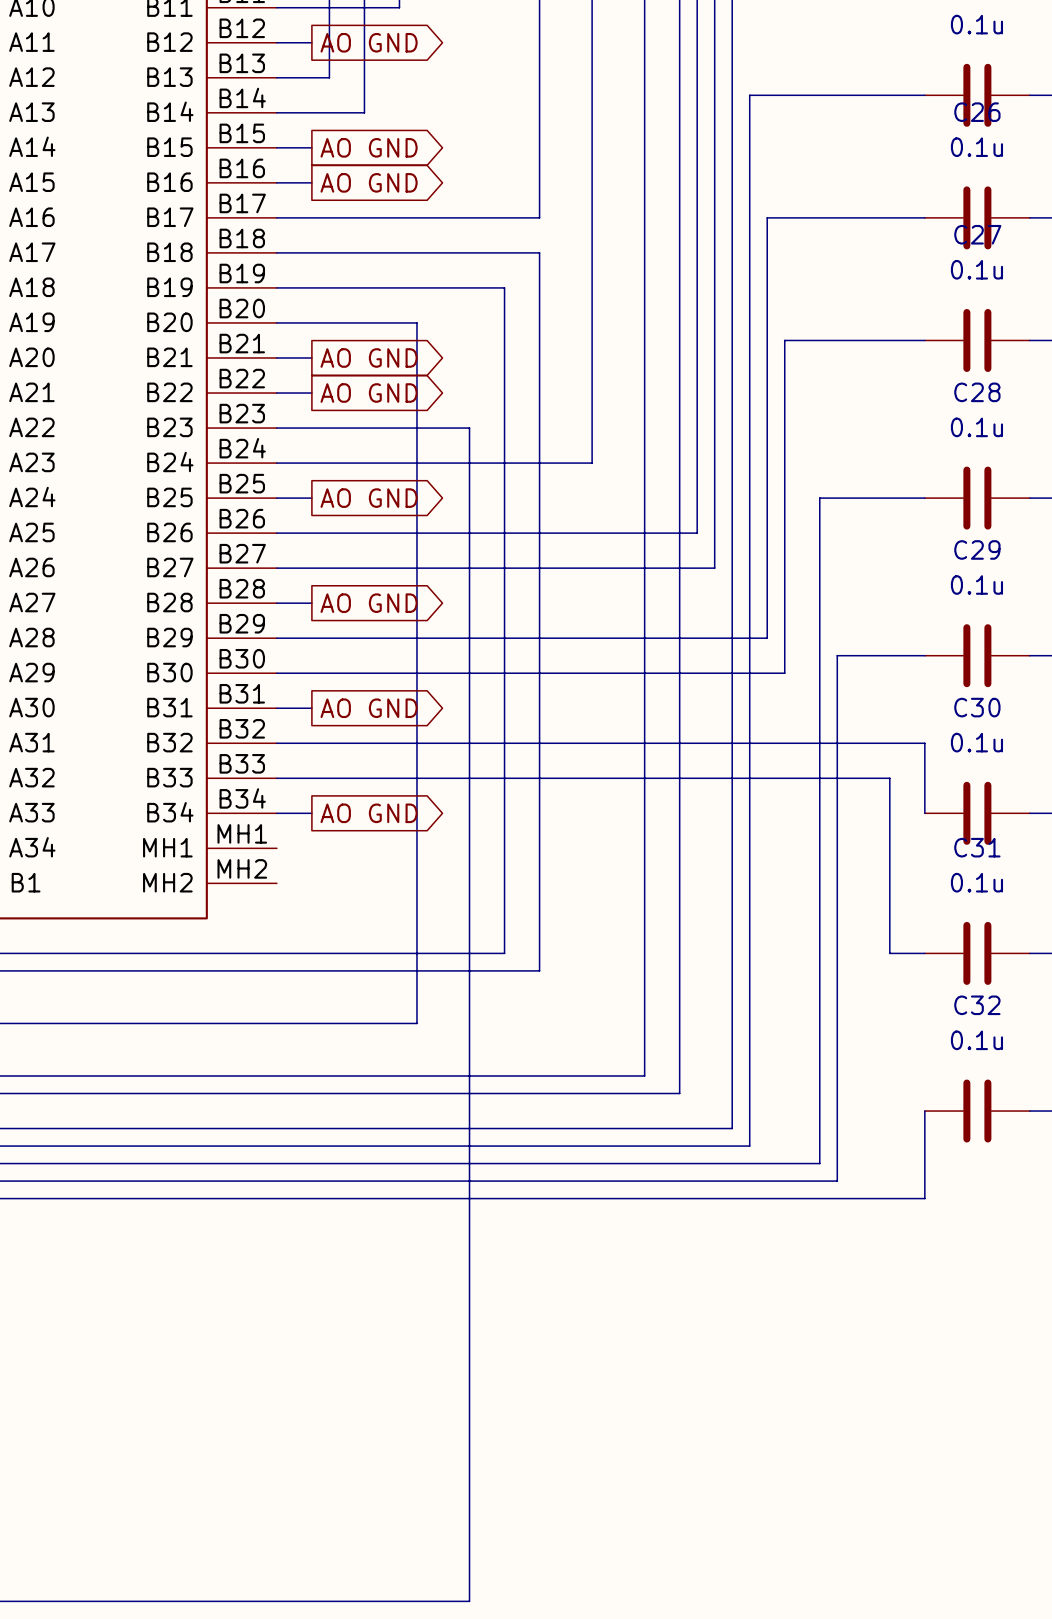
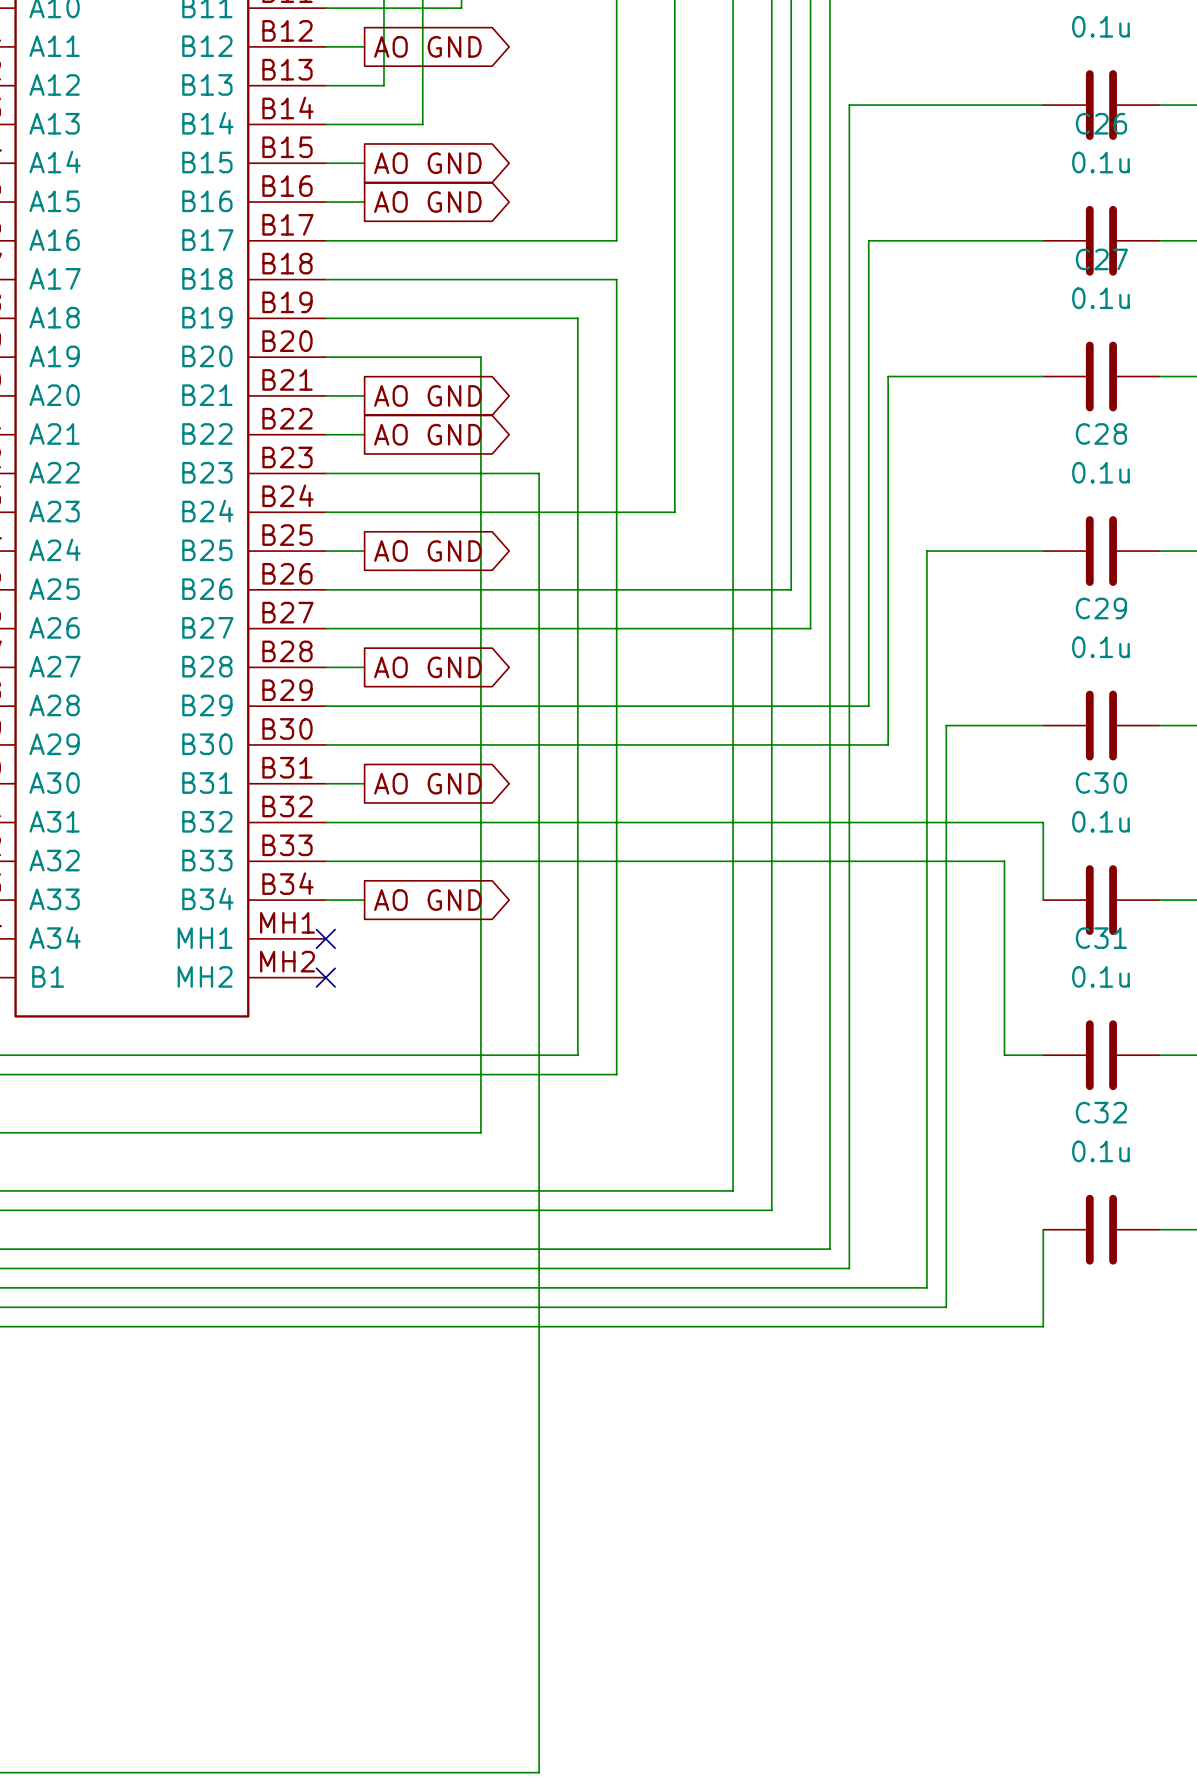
no-connect mark: none -> (325, 938)
no-connect mark: none -> (325, 977)

